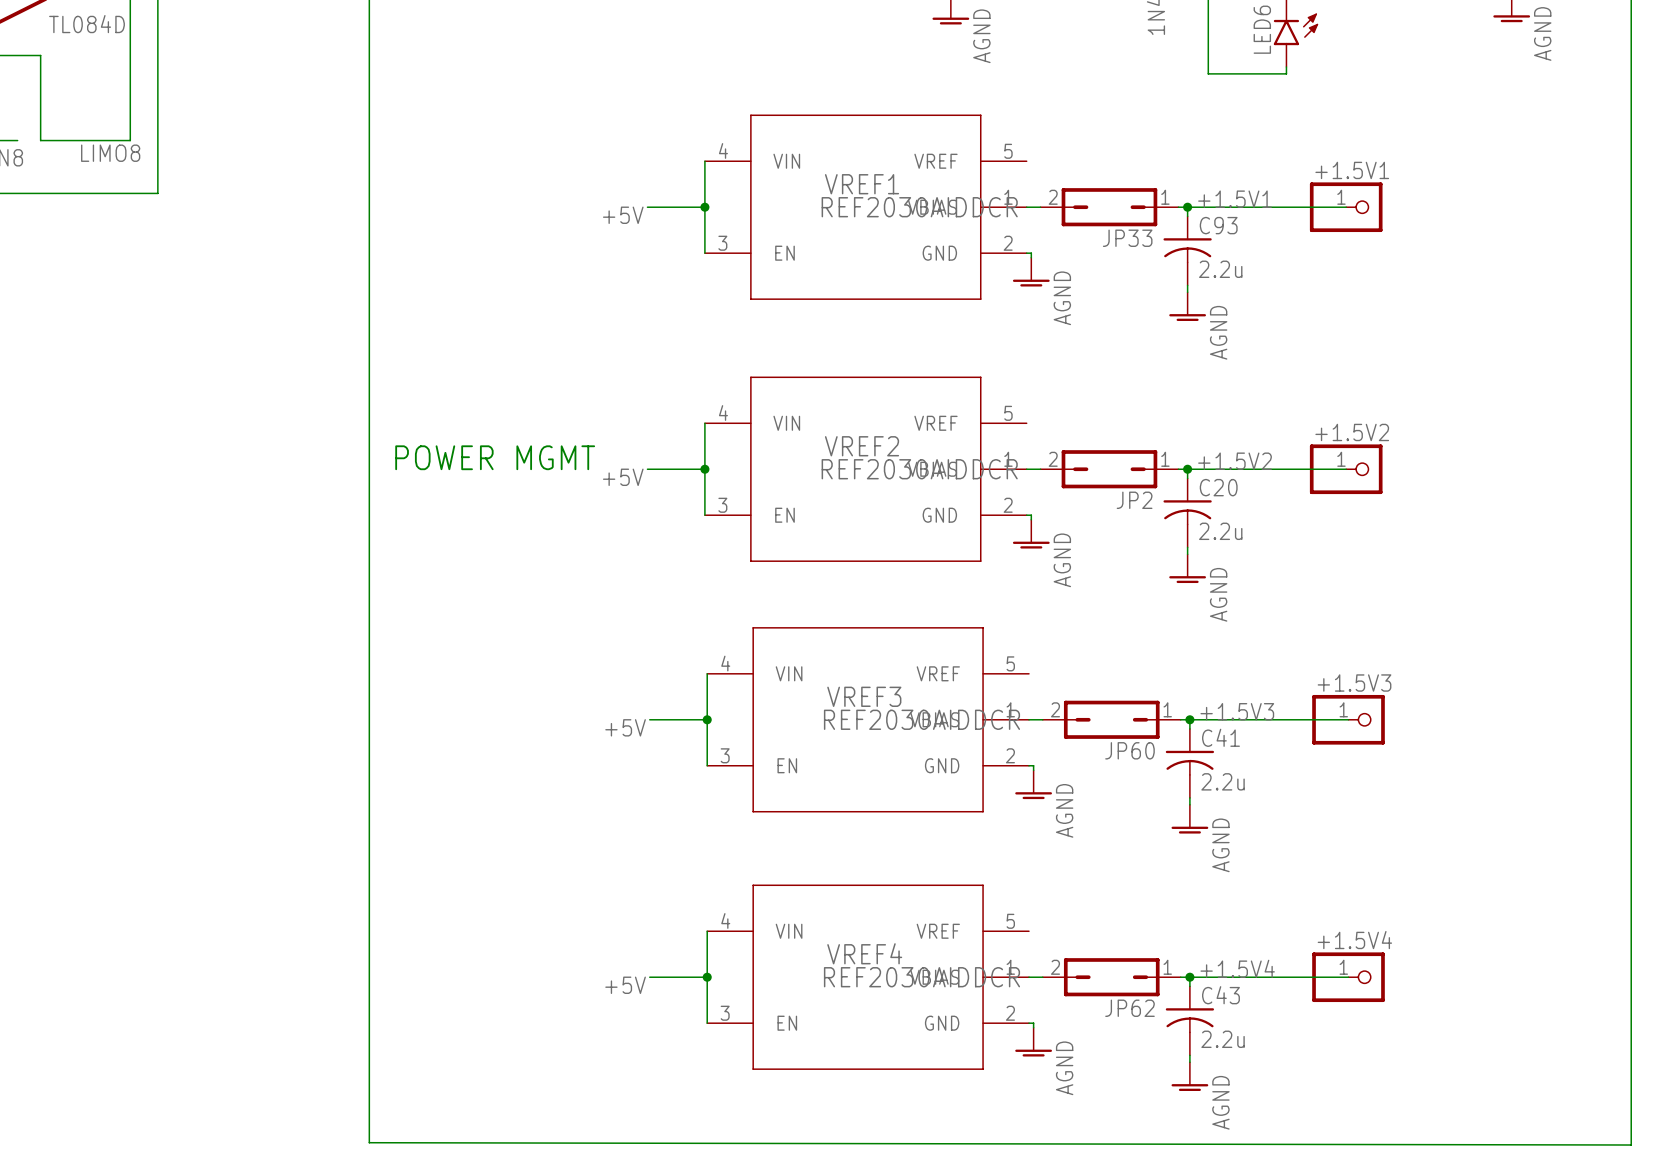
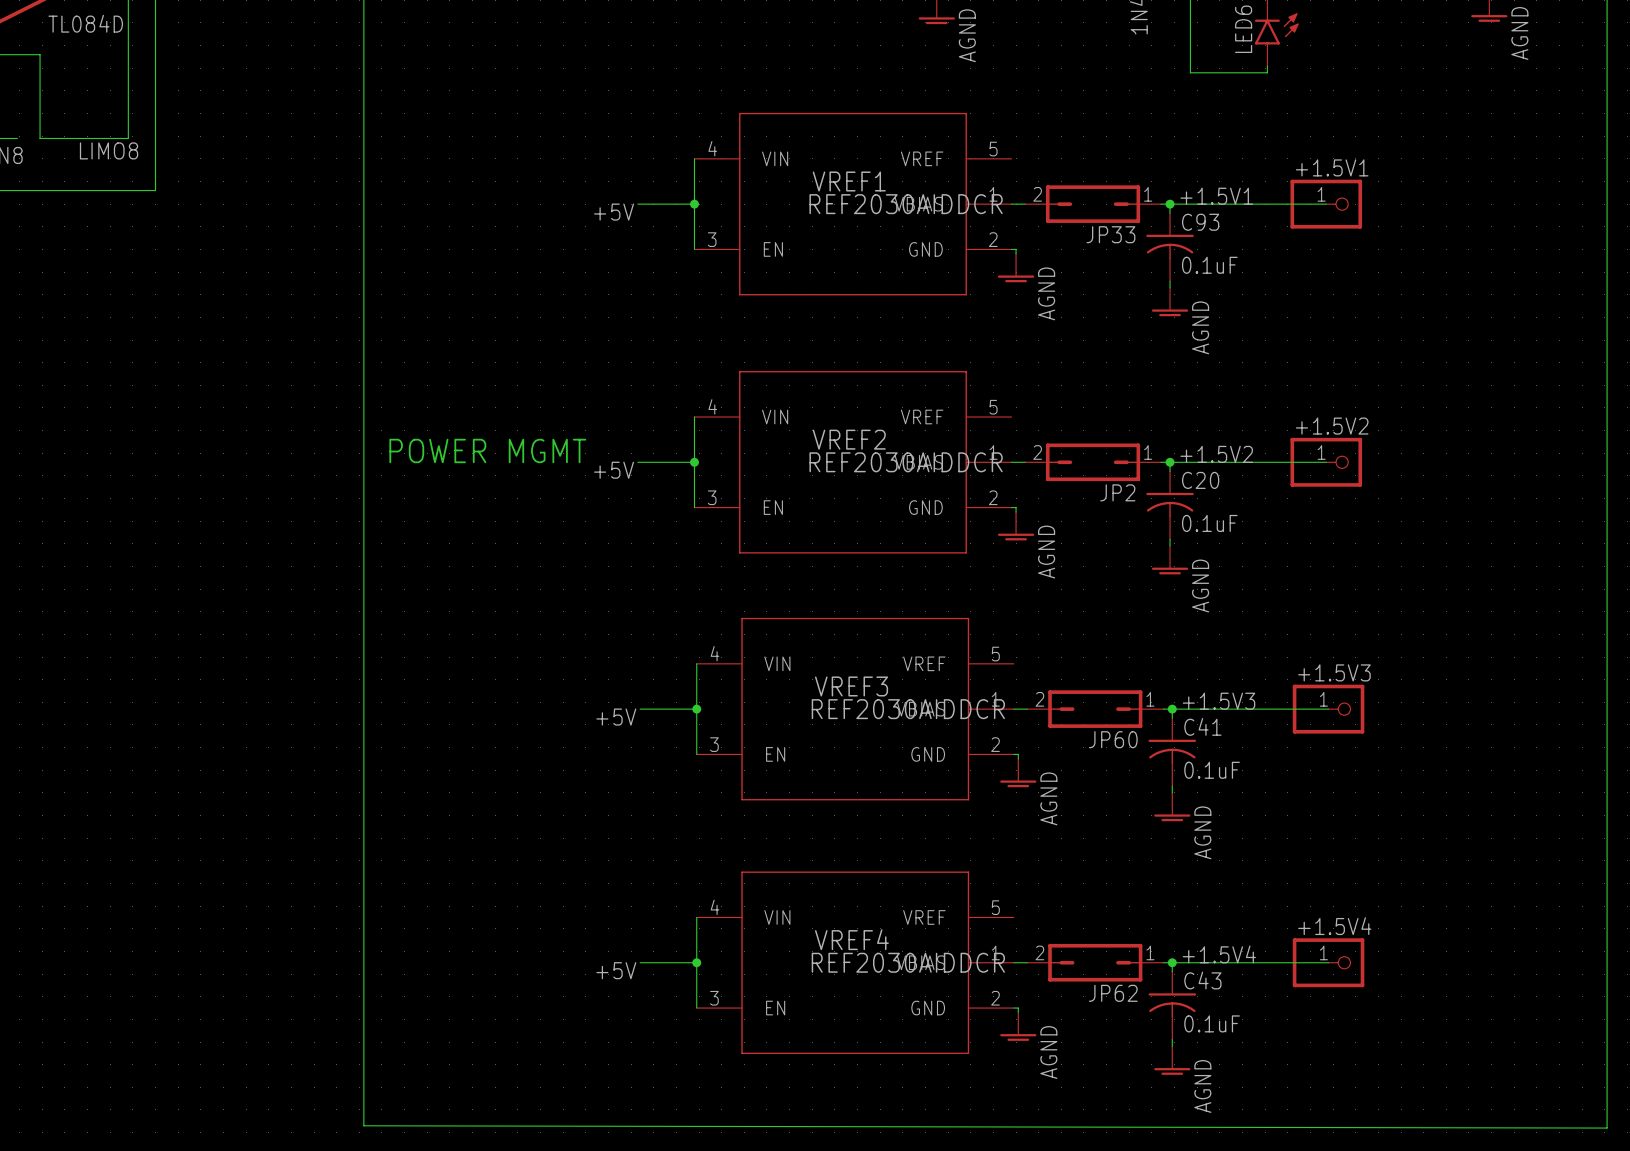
C93 value: 2.2u (1220, 269) -> 0.1uF (1209, 265)
C20 value: 2.2u (1220, 531) -> 0.1uF (1209, 523)
C41 value: 2.2u (1223, 781) -> 0.1uF (1212, 770)
C43 value: 2.2u (1223, 1039) -> 0.1uF (1212, 1023)

